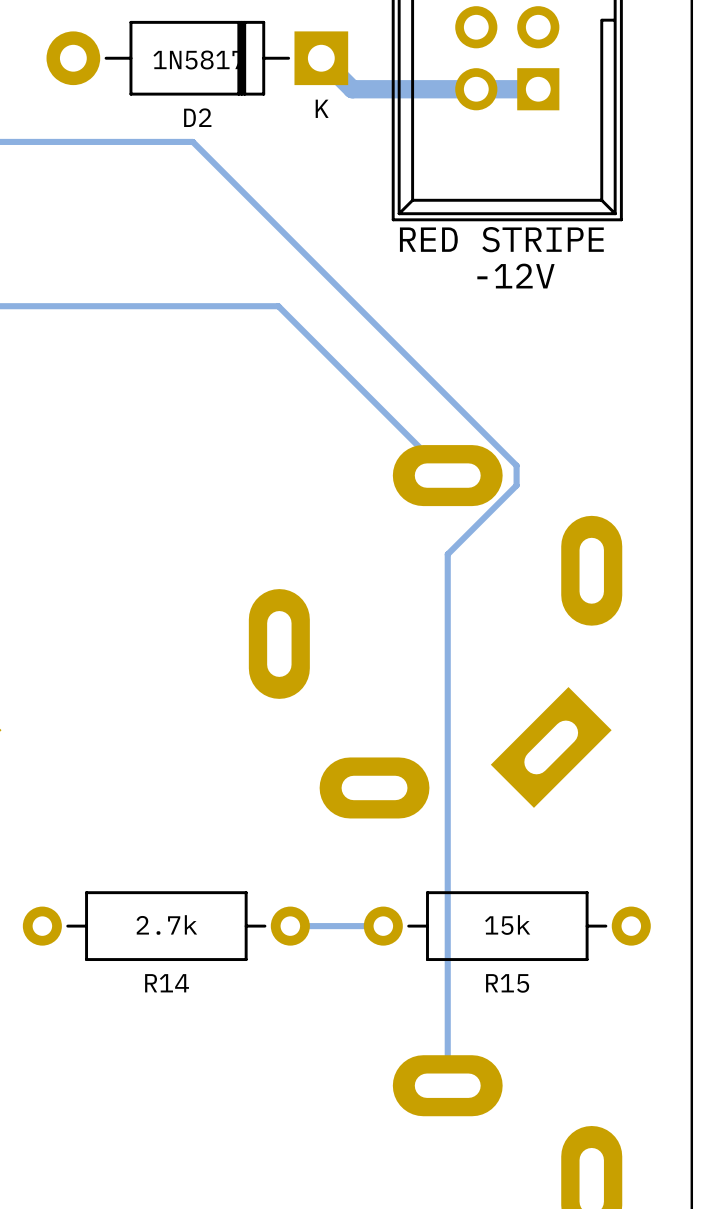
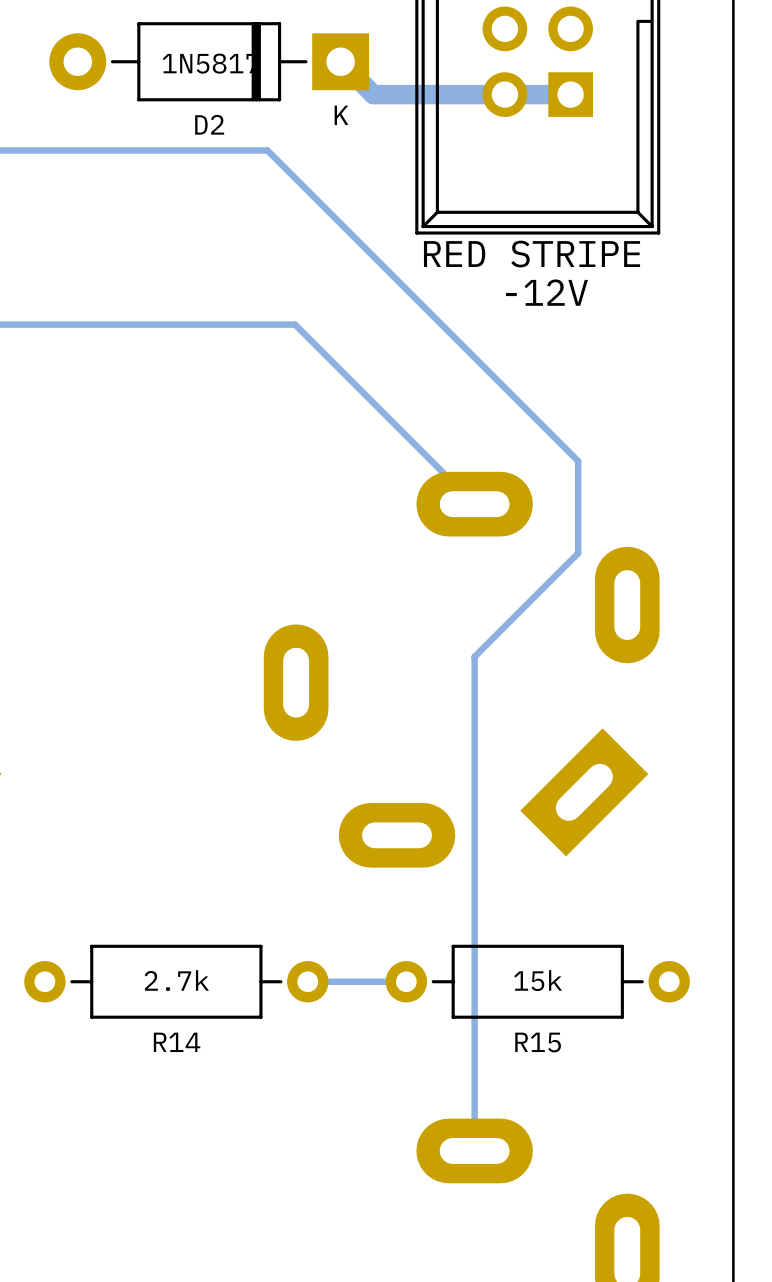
track: (192, 141) (516, 465) (516, 485) (447, 554) (447, 619) -> (204, 150) (267, 150) (578, 461) (578, 553) (474, 656)

